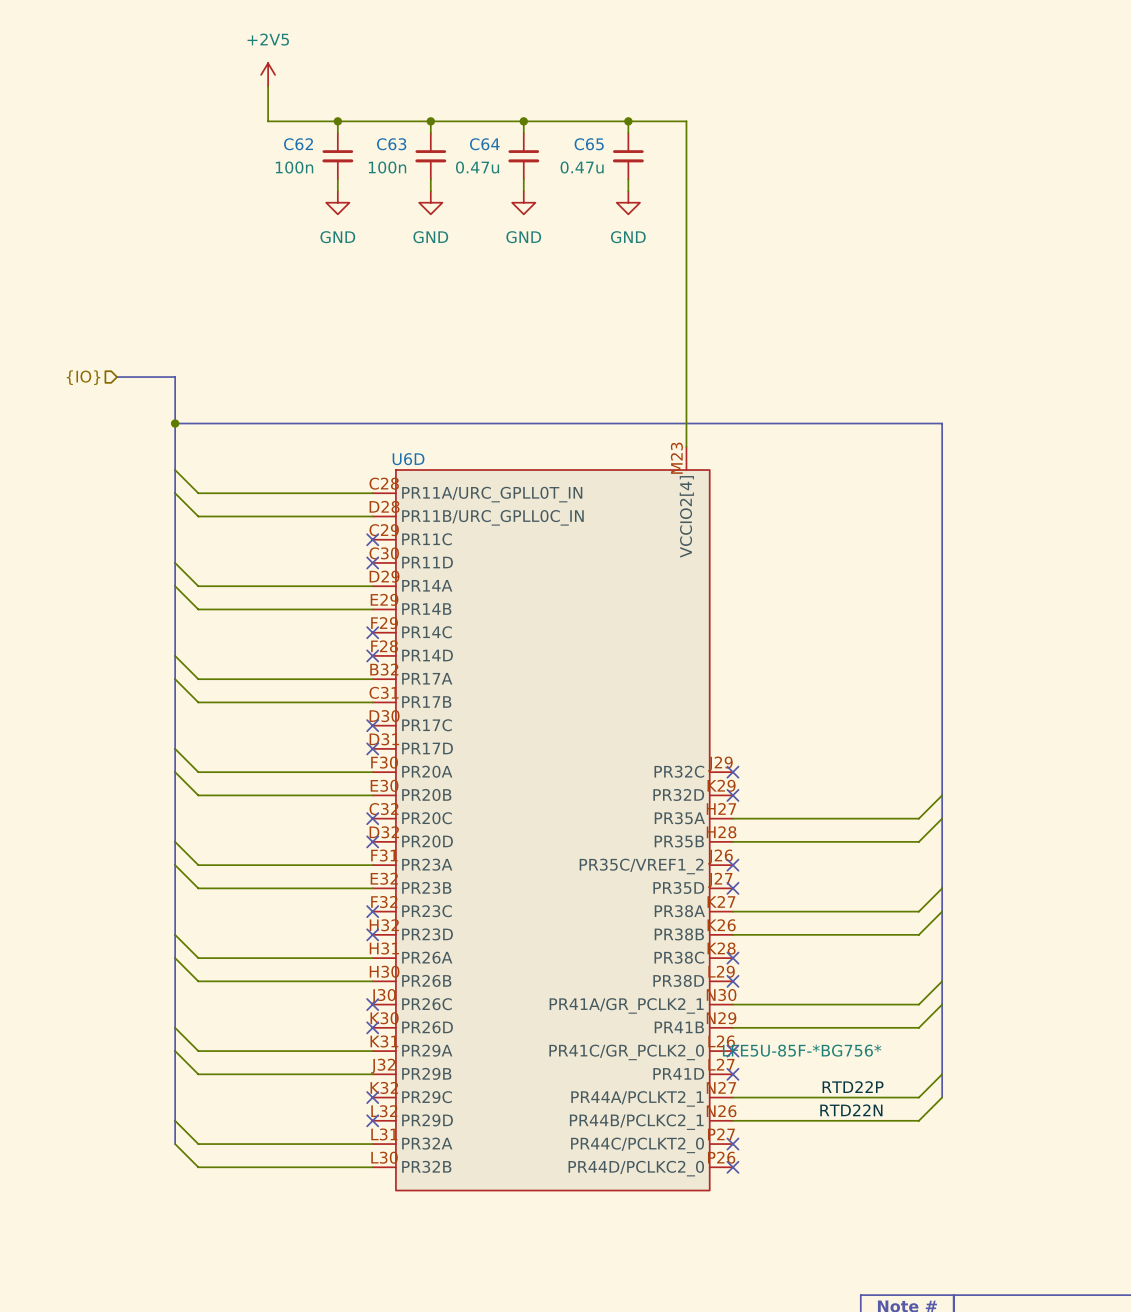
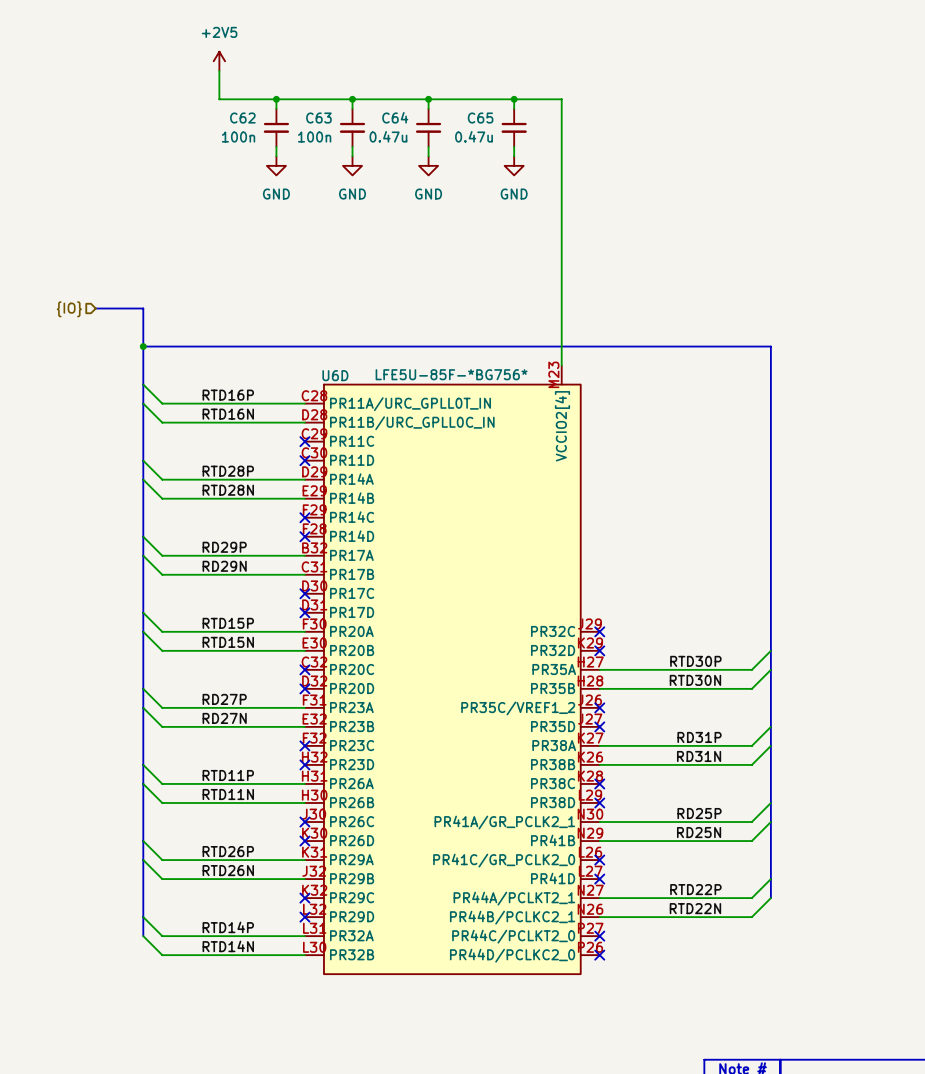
label: none -> RTD16P (228, 395)
label: none -> RTD16N (228, 414)
label: none -> RTD28P (228, 471)
label: none -> RTD28N (228, 490)
label: none -> RD29P (224, 547)
label: none -> RD29N (224, 566)
label: none -> RTD15P (228, 623)
label: none -> RTD15N (228, 642)
label: none -> RTD30P (695, 661)
label: none -> RTD30N (695, 680)
label: none -> RD27P (224, 699)
label: none -> RD27N (224, 718)
label: none -> RD31P (699, 737)
label: none -> RD31N (699, 756)
label: none -> RTD11P (228, 775)
label: none -> RTD11N (228, 794)
label: none -> RD25P (699, 813)
label: none -> RD25N (699, 832)
label: none -> RTD26P (228, 851)
U6D value position: LFE5U-85F-*BG756* (802, 1050) -> LFE5U-85F-*BG756* (451, 374)
label: none -> RTD26N (228, 870)
label: none -> RTD14P (228, 927)
label: none -> RTD14N (228, 946)

